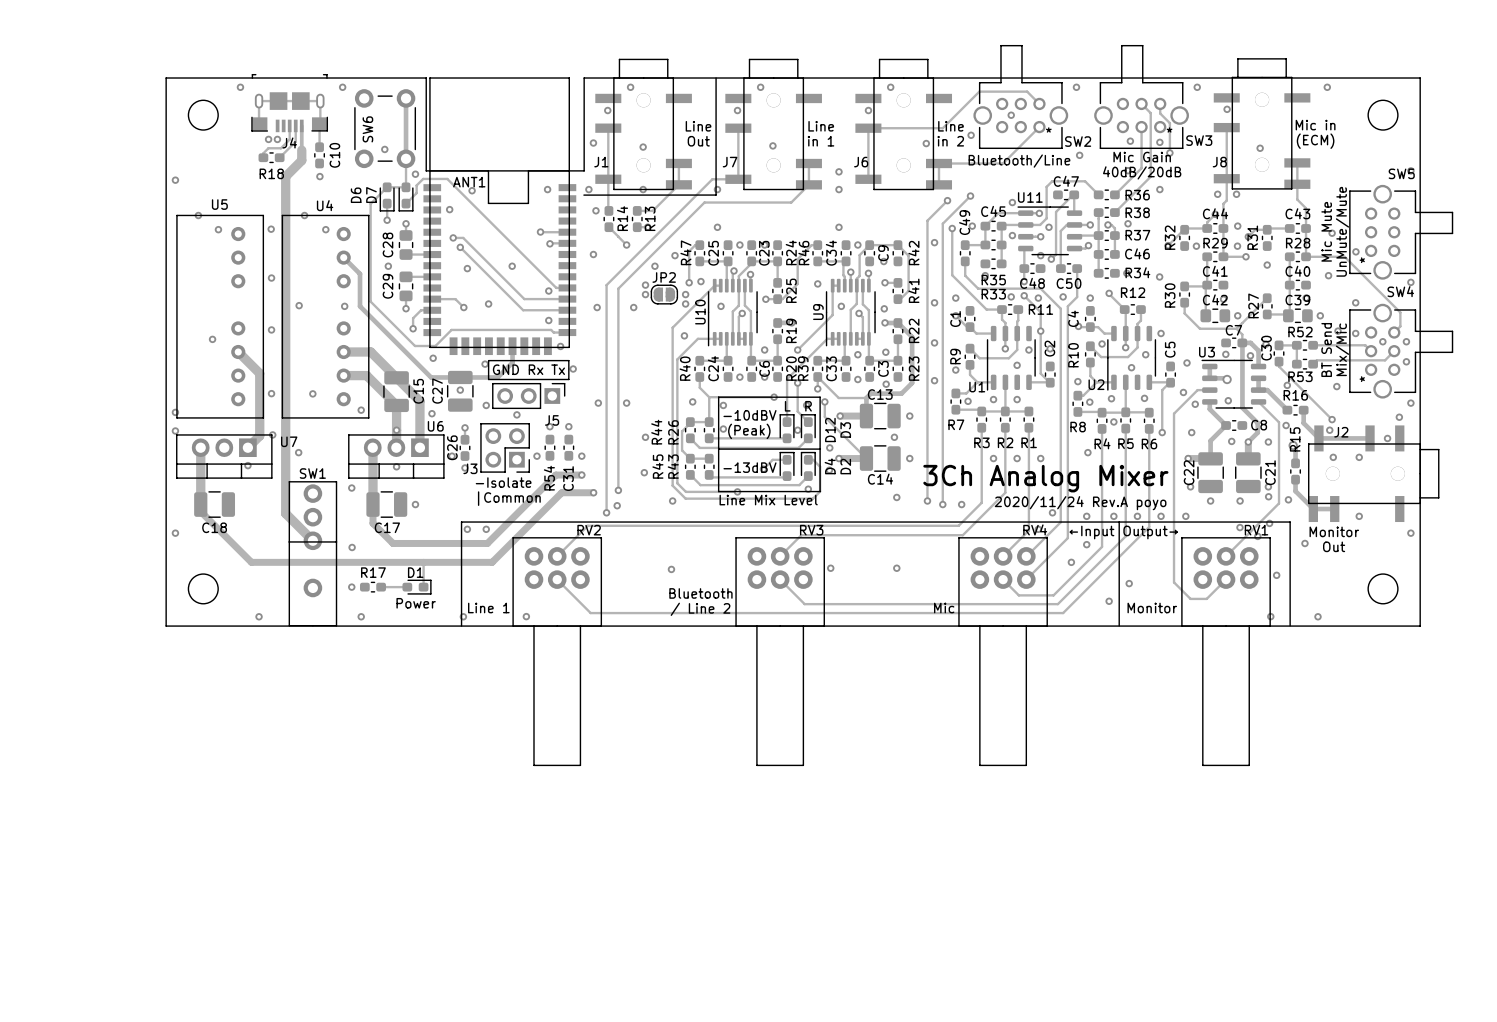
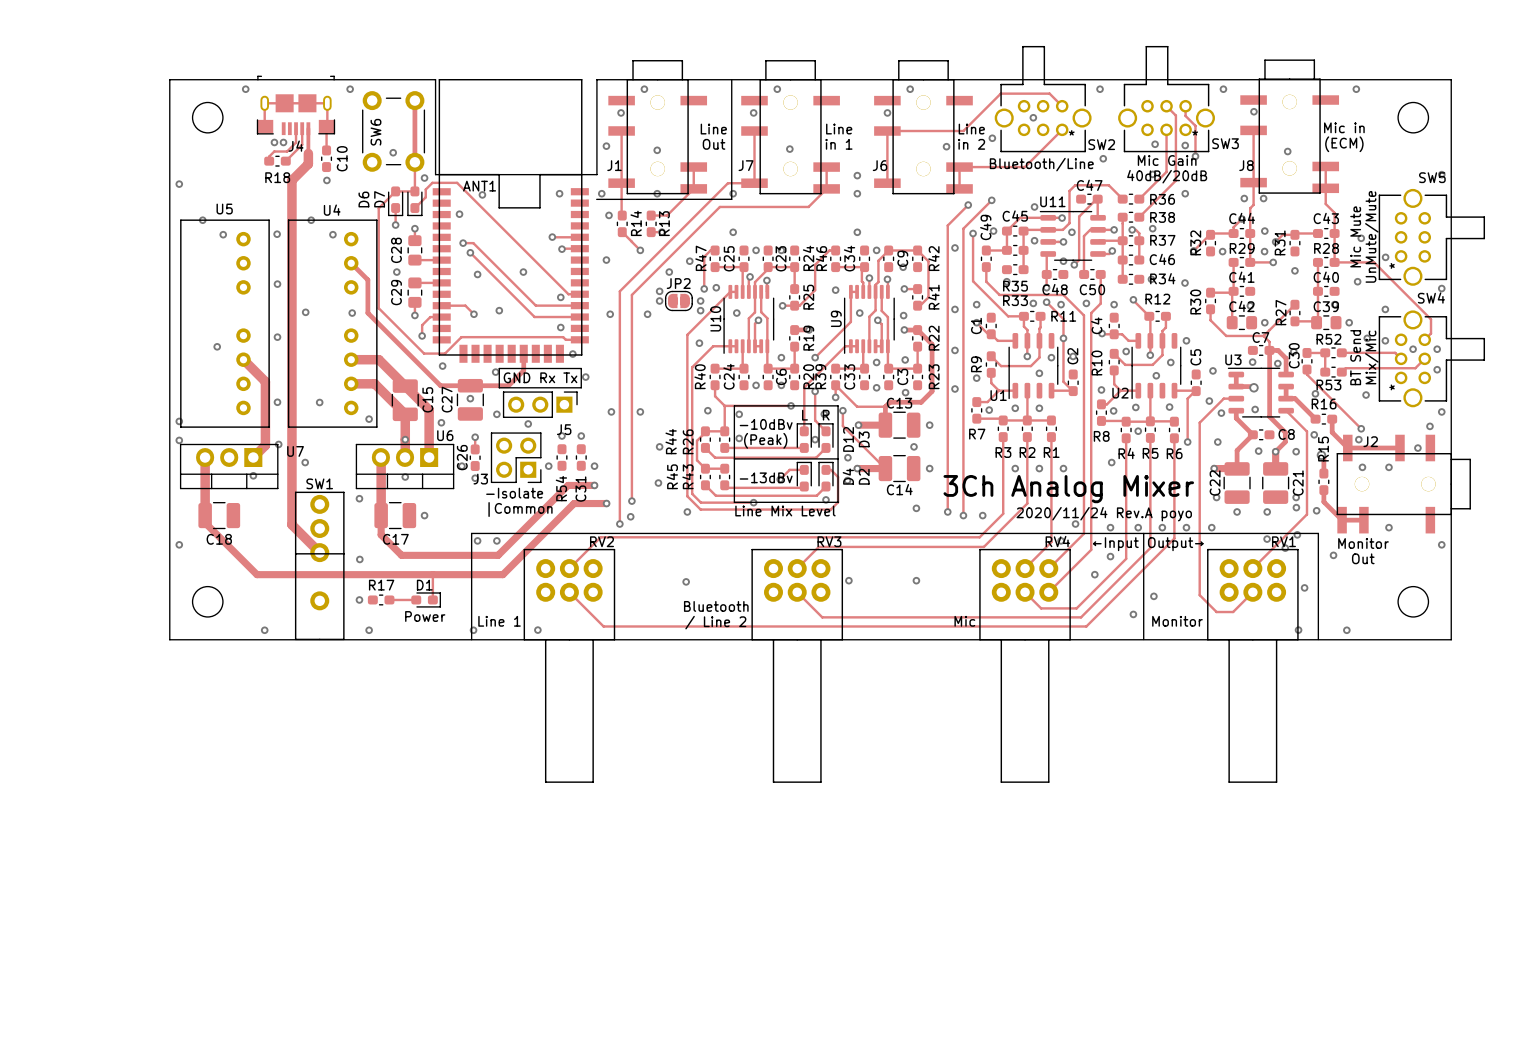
text: -10dBV (749, 415) -> -10dBv (766, 424)
text: -13dBV (749, 467) -> -13dBv (766, 477)

